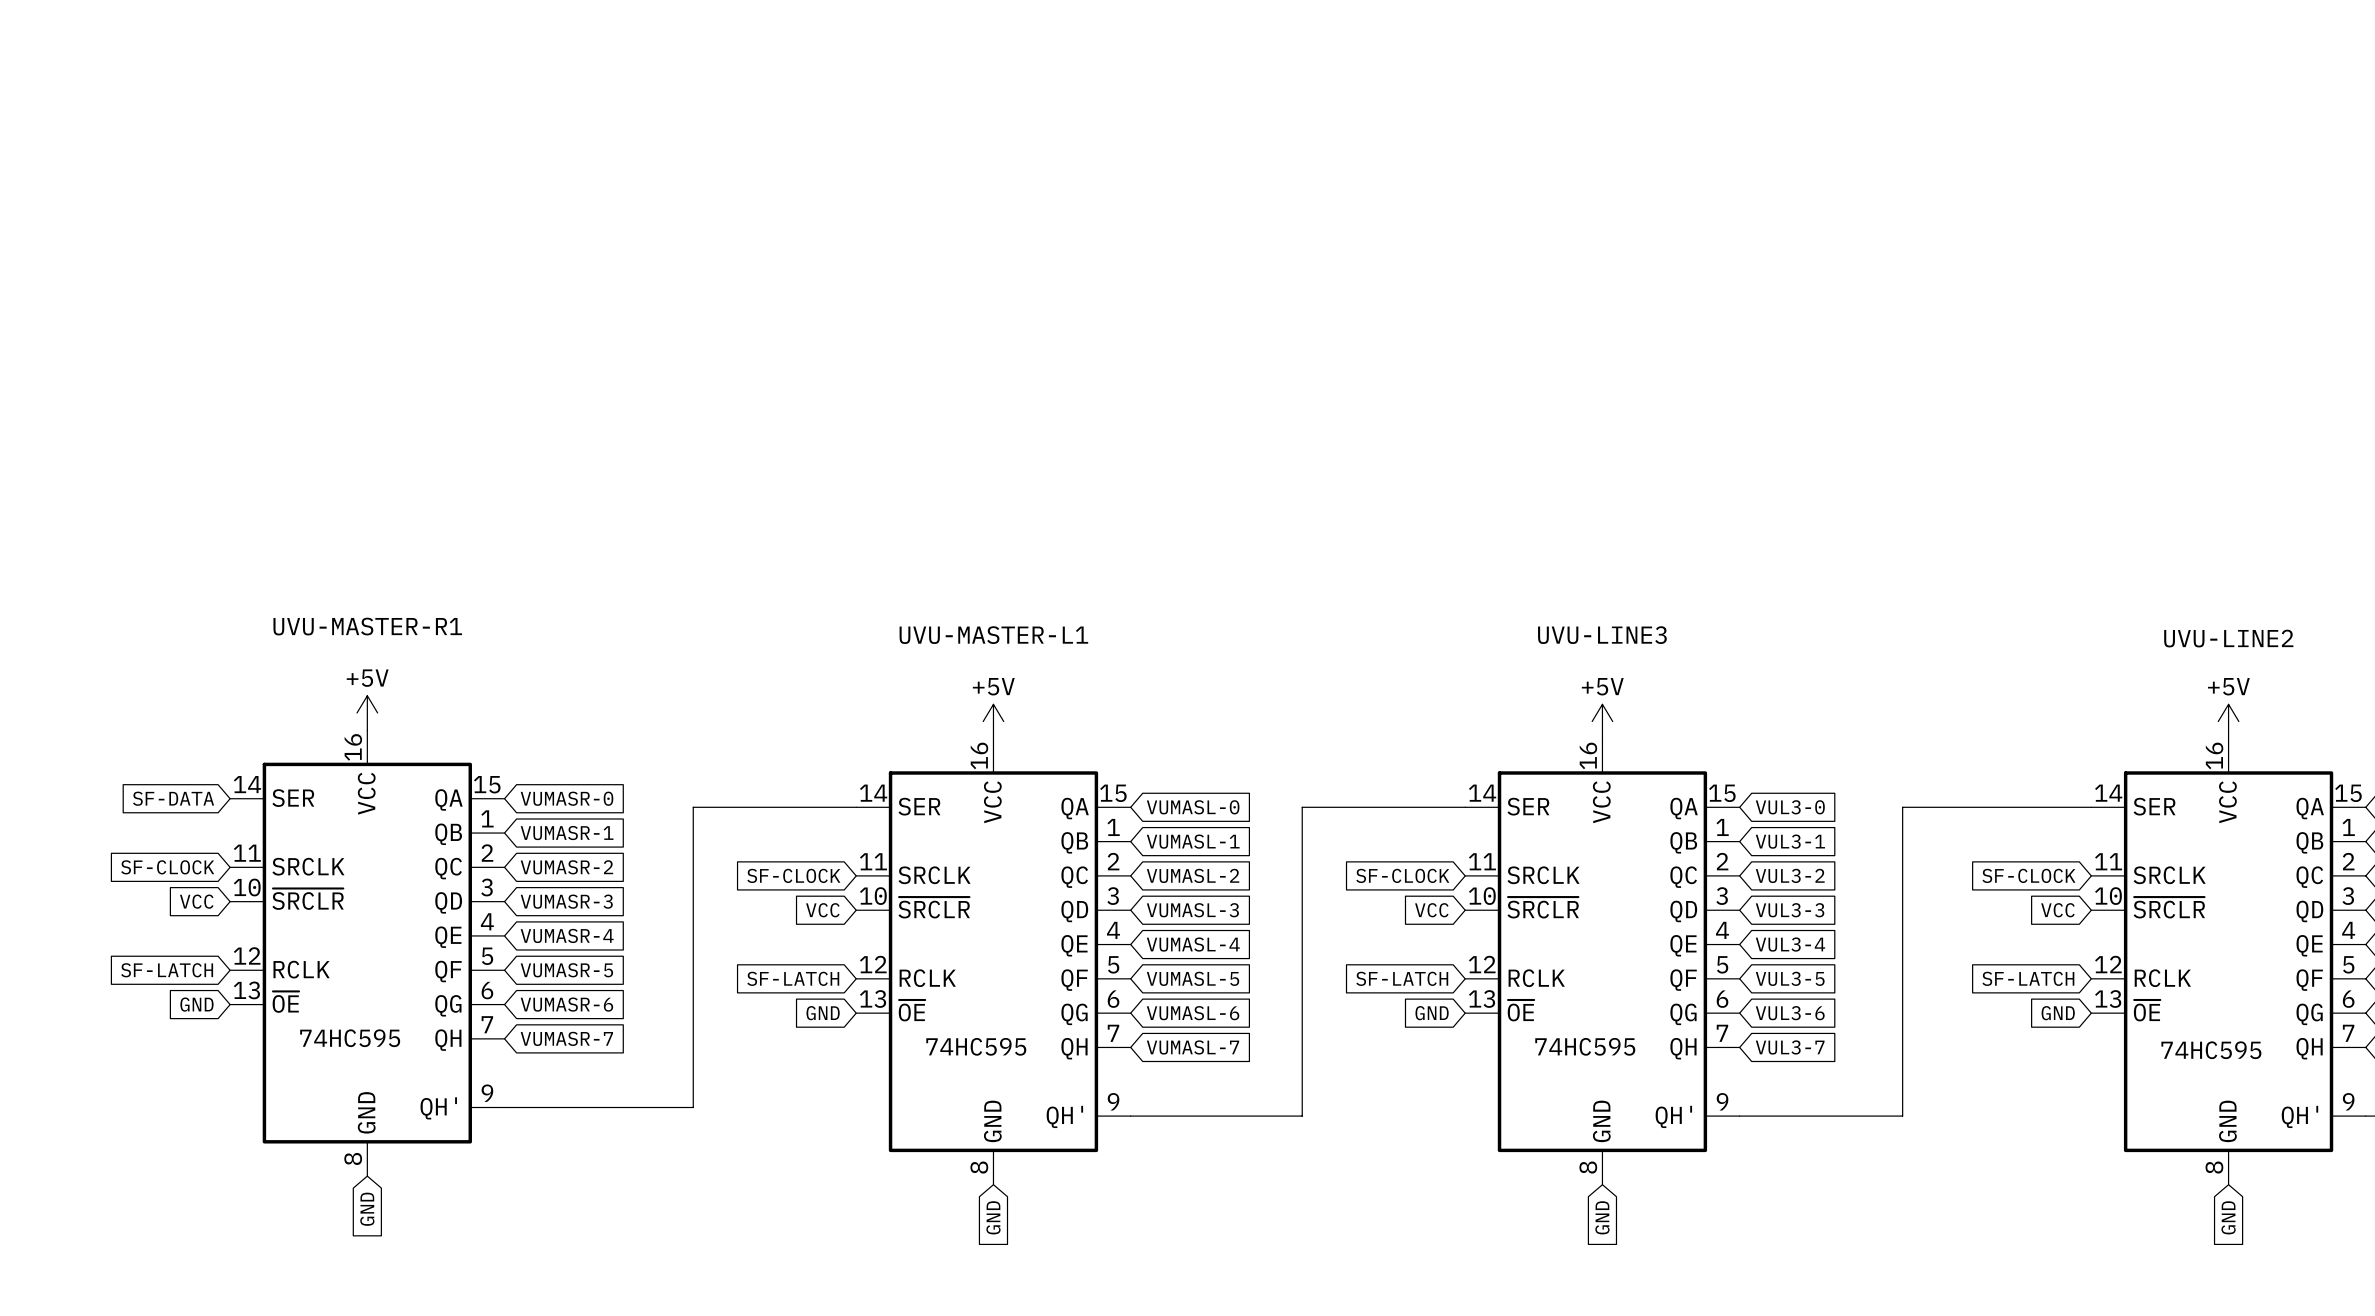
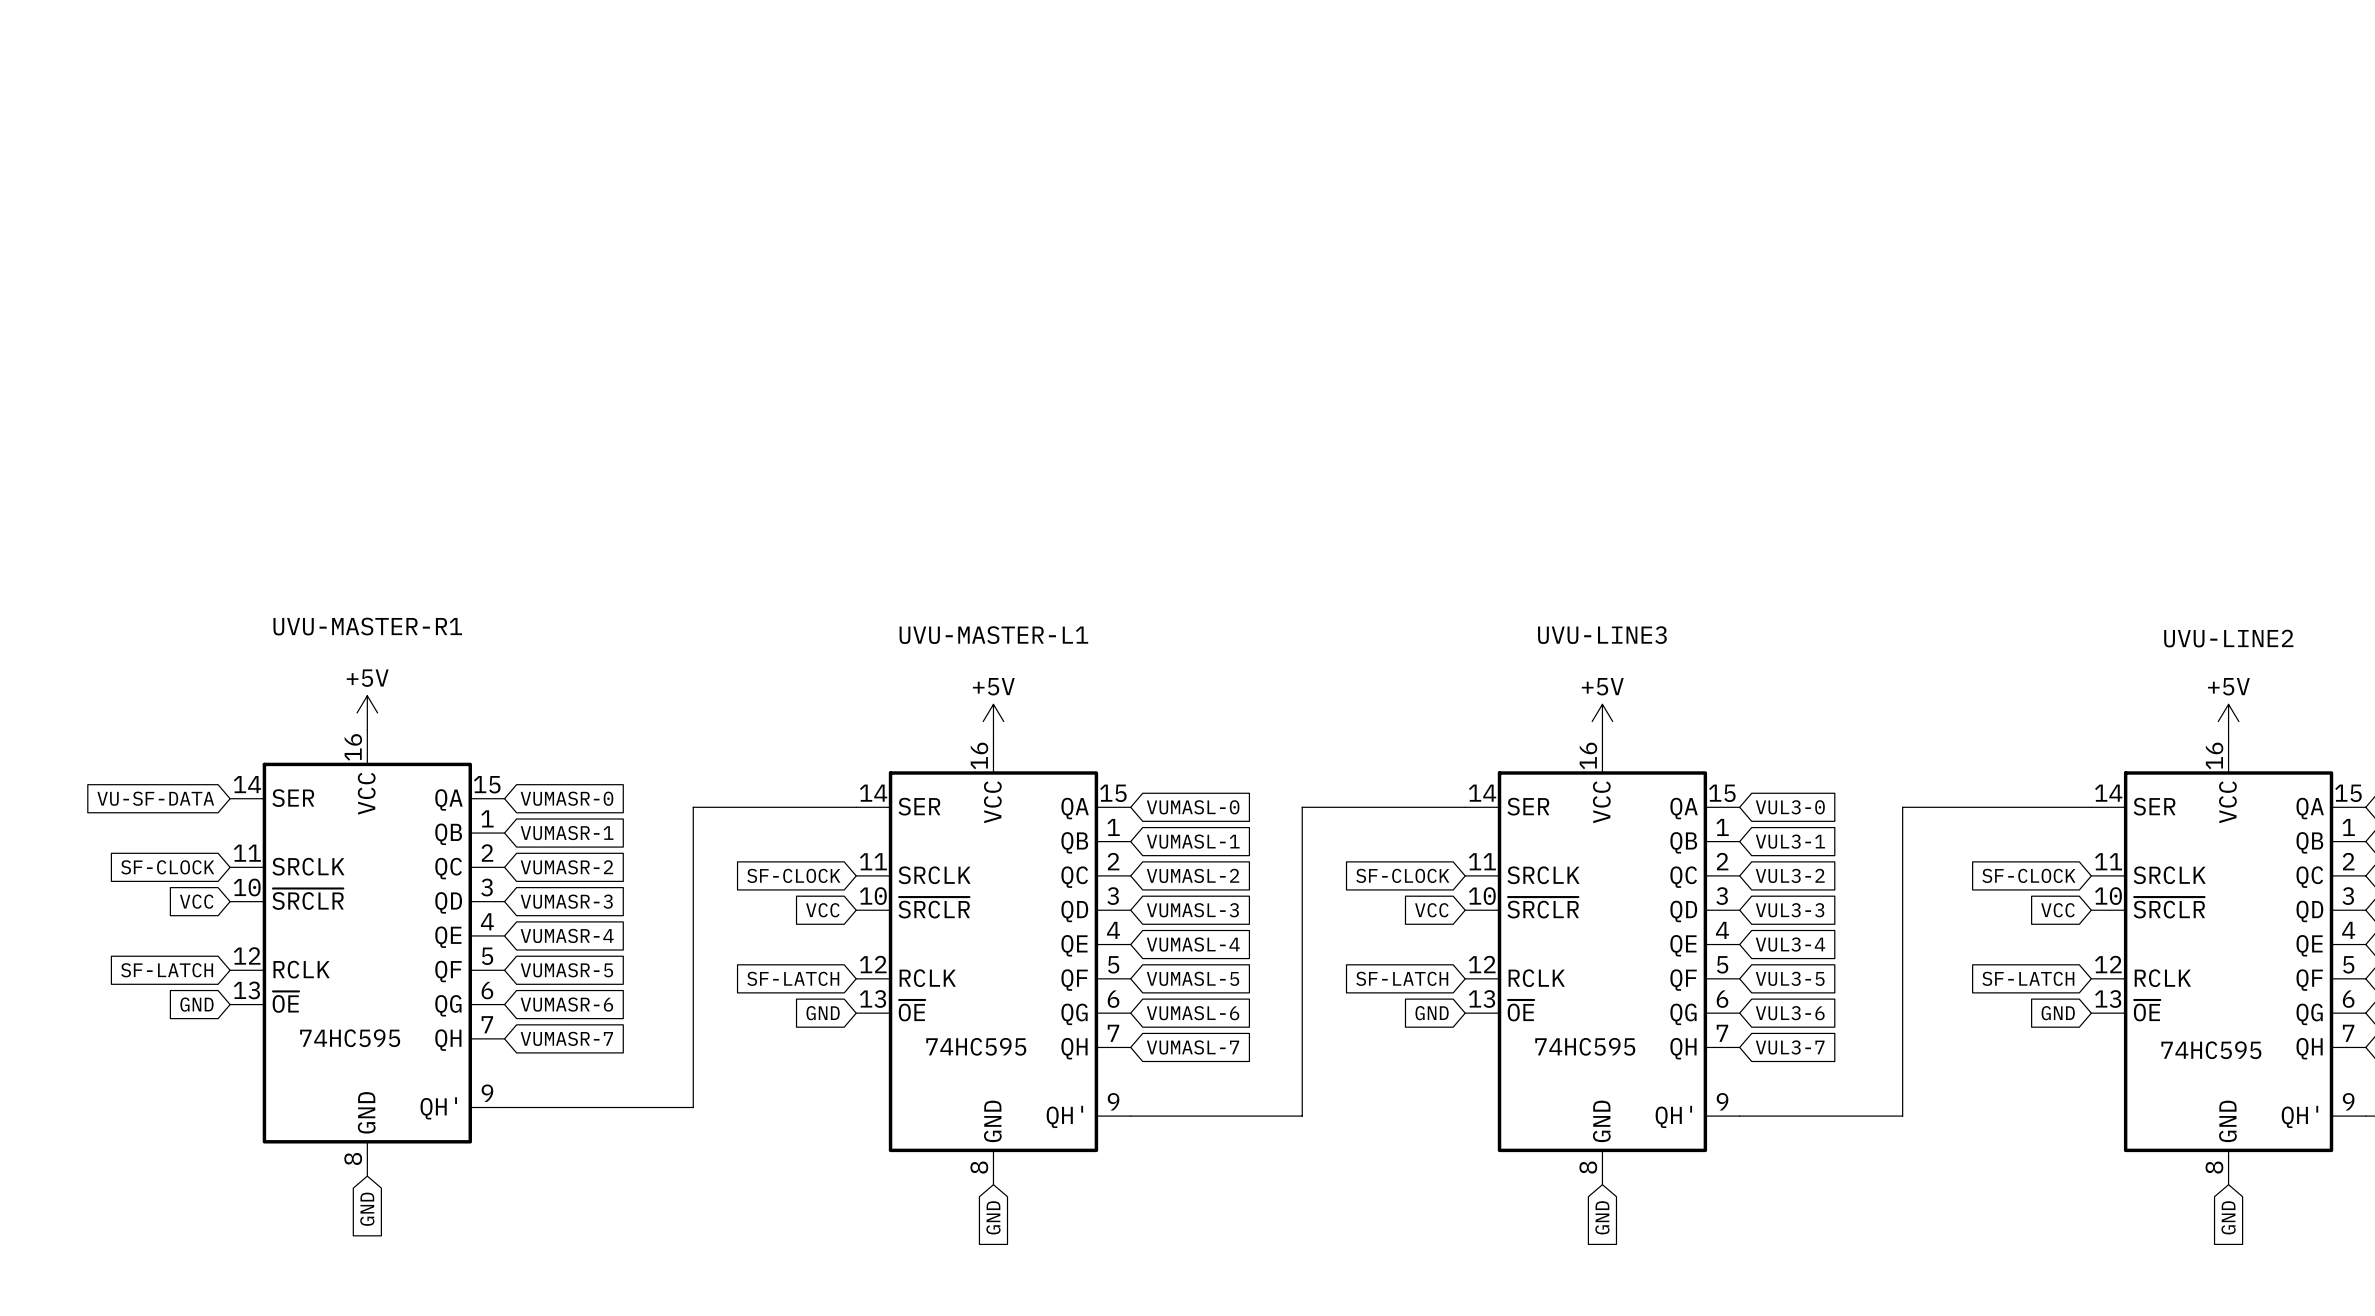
global label: SF-DATA (173, 798) -> VU-SF-DATA (155, 798)

